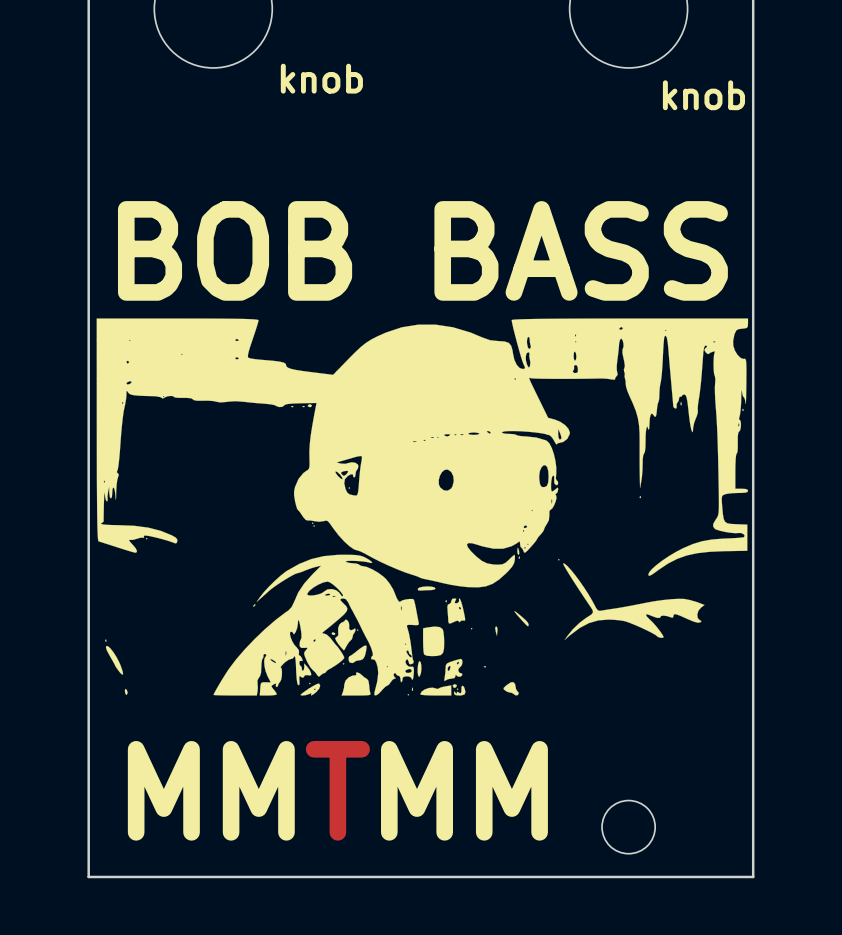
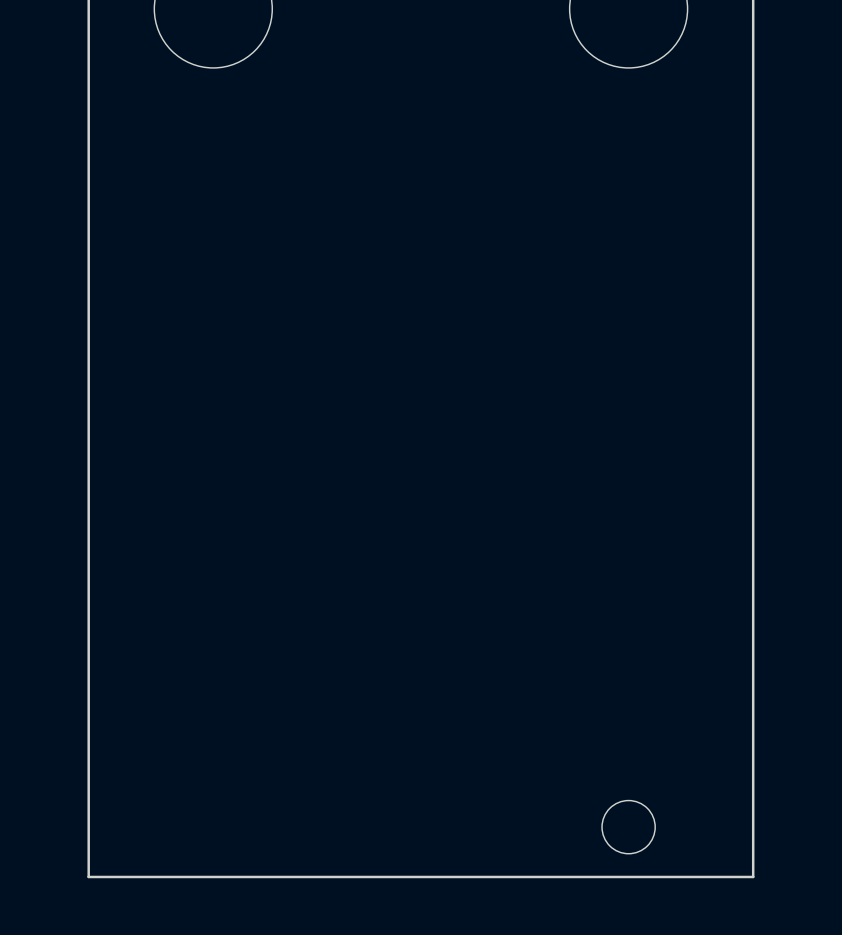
text: knob (321, 78) -> none
text: knob (703, 95) -> none
text: BOB BASS (422, 250) -> none
drawing: [96, 318, 749, 696] -> none
text: T (337, 790) -> none
text: MM MM (337, 790) -> none

